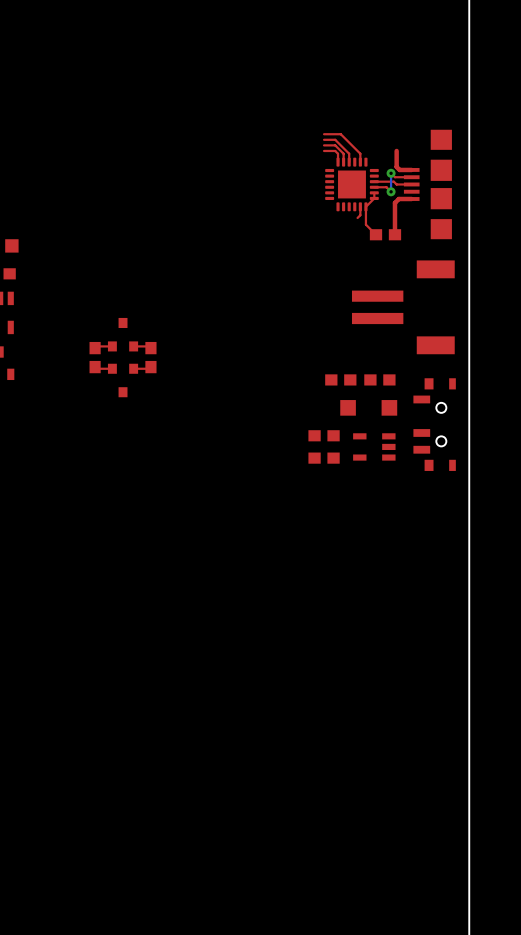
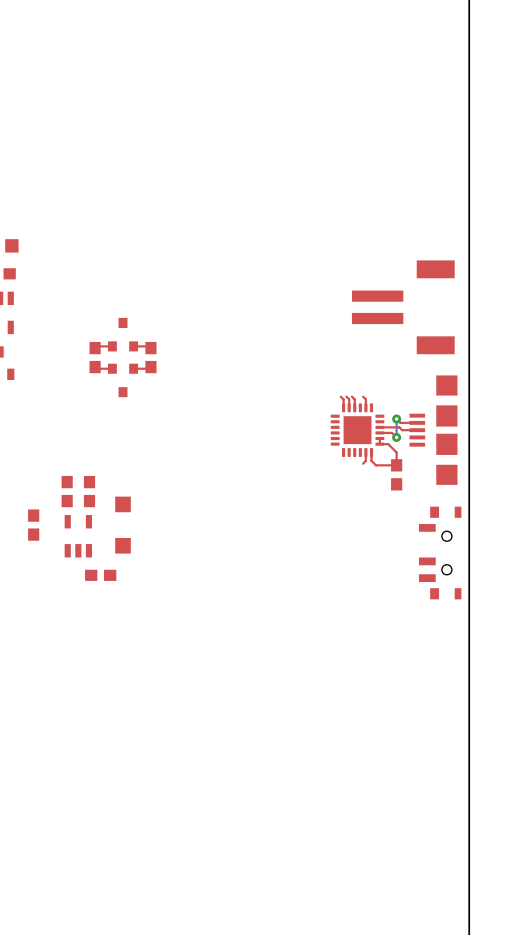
top track: (324, 134) (340, 134) (360, 153) (360, 162) -> none
top track: (324, 139) (335, 139) (349, 153) (349, 162) -> none
top track: (324, 145) (335, 145) (343, 153) (343, 162) -> none
top track: (324, 150) (335, 150) (338, 153) (338, 162) -> none
top track: (396, 150) (396, 166) (399, 169) (411, 169) -> none
top track: (391, 173) (394, 177) (411, 177) -> (396, 418) (400, 422) (417, 422)
bottom track: (391, 173) (391, 191) -> (396, 418) (396, 437)
via: (391, 173) -> none
top track: (374, 181) (411, 184) -> (379, 427) (417, 430)
part position: (351, 184) -> (357, 430)
part: (427, 184) -> none
top track: (374, 187) (386, 187) (391, 191) -> (379, 432) (392, 432) (396, 437)
via: (391, 191) -> none
top track: (374, 192) (374, 198) (365, 206) (365, 224) (375, 234) -> none
top track: (411, 199) (398, 199) (394, 202) (394, 234) -> none
top track: (360, 206) (360, 215) (357, 217) -> (365, 452) (365, 460) (363, 463)
part: (385, 234) -> none
part footprint: [413, 378, 456, 471] -> [409, 375, 458, 485]
part: (340, 379) -> none
part: (379, 379) -> none
top track: none -> (340, 396) (343, 399) (343, 407)
top track: none -> (346, 396) (349, 399) (349, 407)
top track: none -> (351, 396) (354, 399) (354, 407)
top track: none -> (363, 396) (365, 399) (365, 407)
part rotation: 0° (368, 407) -> 90° clockwise (123, 525)
part position: (368, 407) -> (123, 525)
via: none -> (396, 418)
part: (324, 435) -> none
via: none -> (396, 437)
top track: none -> (379, 438) (379, 444) (388, 444) (396, 452) (396, 465) (375, 465) (371, 460) (371, 452)
part: (374, 446) -> none
part: (324, 458) -> none
part: none -> (396, 474)
part: none -> (67, 491)
part: none -> (89, 491)
part: none -> (33, 525)
part: none -> (78, 536)
part: none -> (440, 553)
part: none -> (100, 575)

